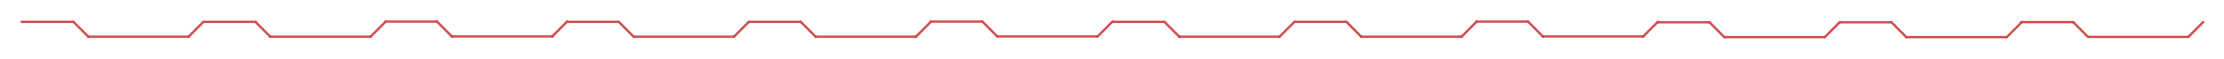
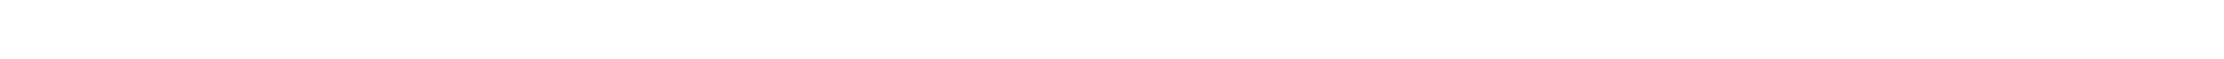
top track: (203, 21) (188, 36) (88, 36) (73, 21) (21, 21) -> none
top track: (385, 21) (370, 36) (270, 36) (255, 21) (203, 21) -> none
top track: (567, 21) (552, 36) (451, 36) (437, 21) (385, 21) -> none
top track: (748, 21) (734, 36) (633, 36) (618, 21) (566, 21) -> none
top track: (930, 21) (915, 36) (815, 36) (800, 21) (748, 21) -> none
top track: (1112, 21) (1097, 36) (997, 36) (982, 21) (930, 21) -> none
top track: (1294, 21) (1279, 36) (1179, 36) (1164, 21) (1112, 21) -> none
top track: (1476, 21) (1461, 36) (1361, 36) (1346, 21) (1294, 21) -> none
top track: (1658, 21) (1643, 36) (1542, 36) (1528, 21) (1476, 21) -> none
top track: (1839, 22) (1824, 37) (1724, 37) (1709, 22) (1657, 22) -> none
top track: (2021, 22) (2006, 37) (1906, 37) (1891, 22) (1839, 22) -> none
top track: (2203, 22) (2188, 36) (2088, 36) (2073, 22) (2021, 22) -> none

